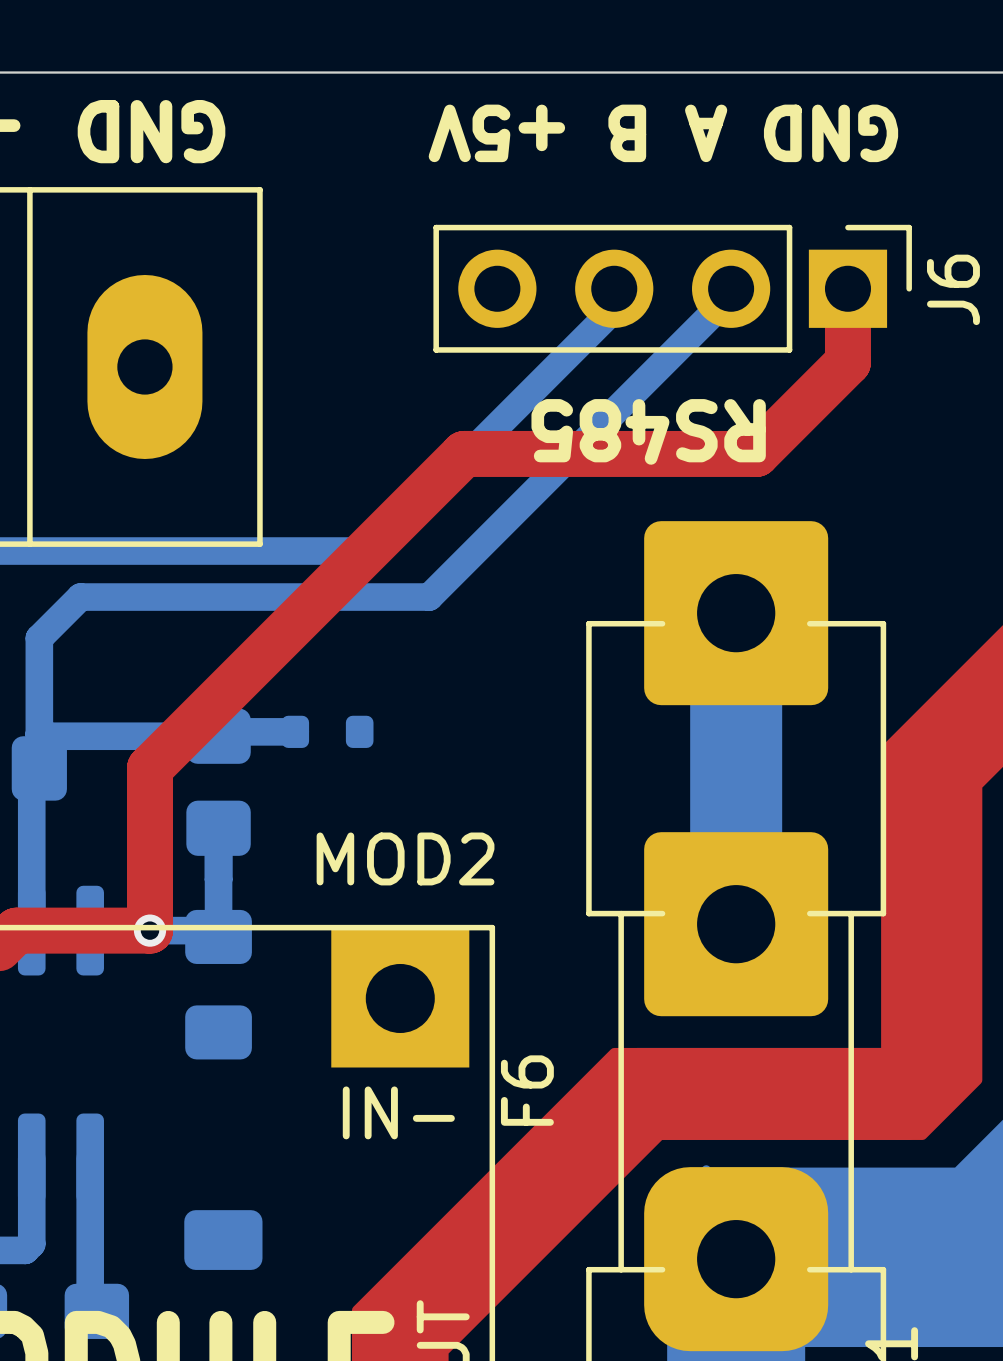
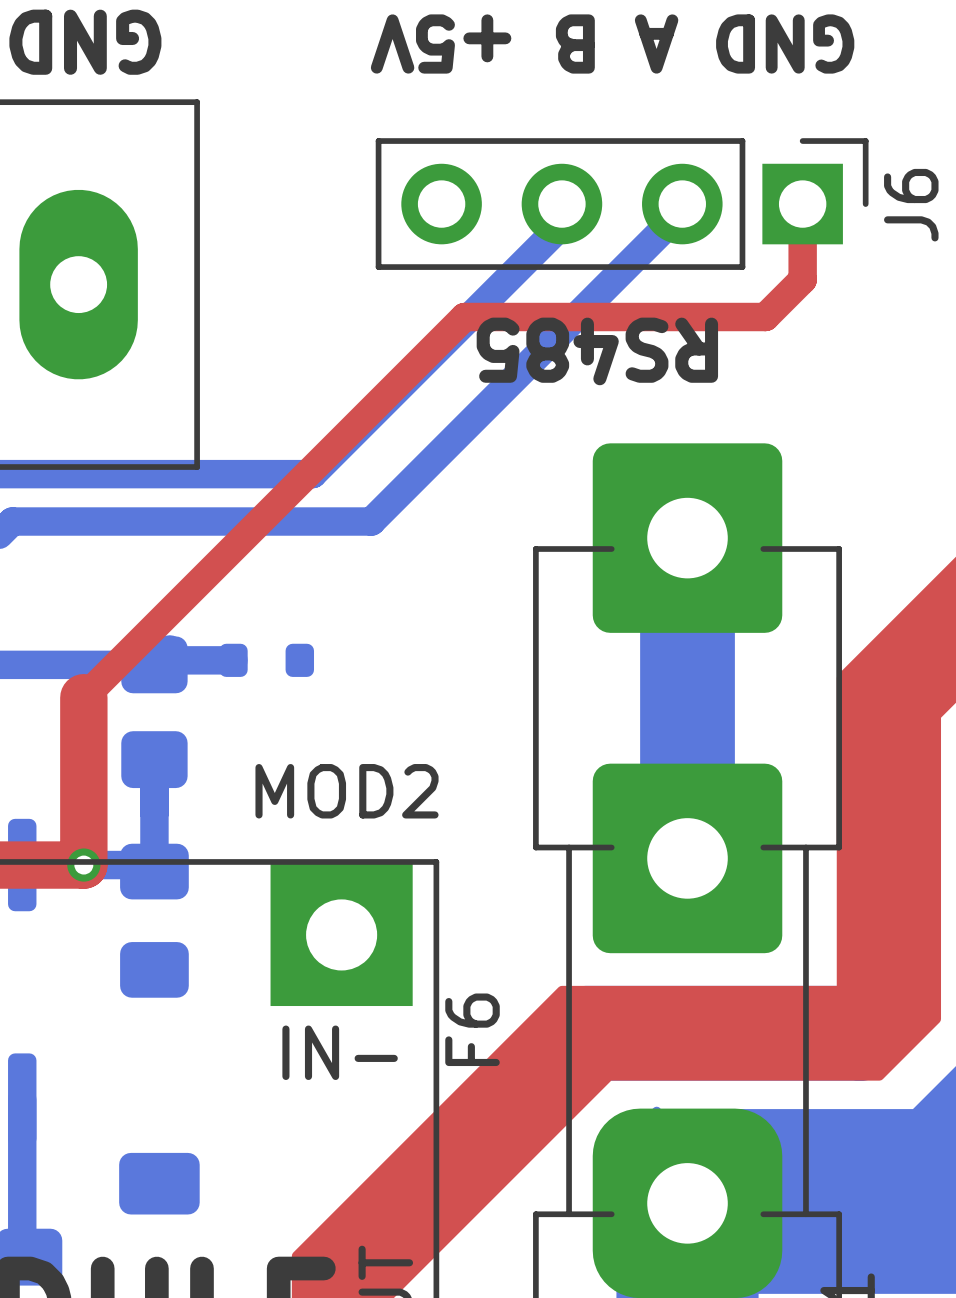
top track width: thick (847, 288) (847, 362) (811, 398) -> thin (802, 204) (802, 279) (765, 317)
top track: (811, 398) (756, 453) (464, 453) -> (765, 317) (464, 317) (407, 374)
top track width: thick (464, 453) (150, 768) -> thin (407, 374) (83, 697)

